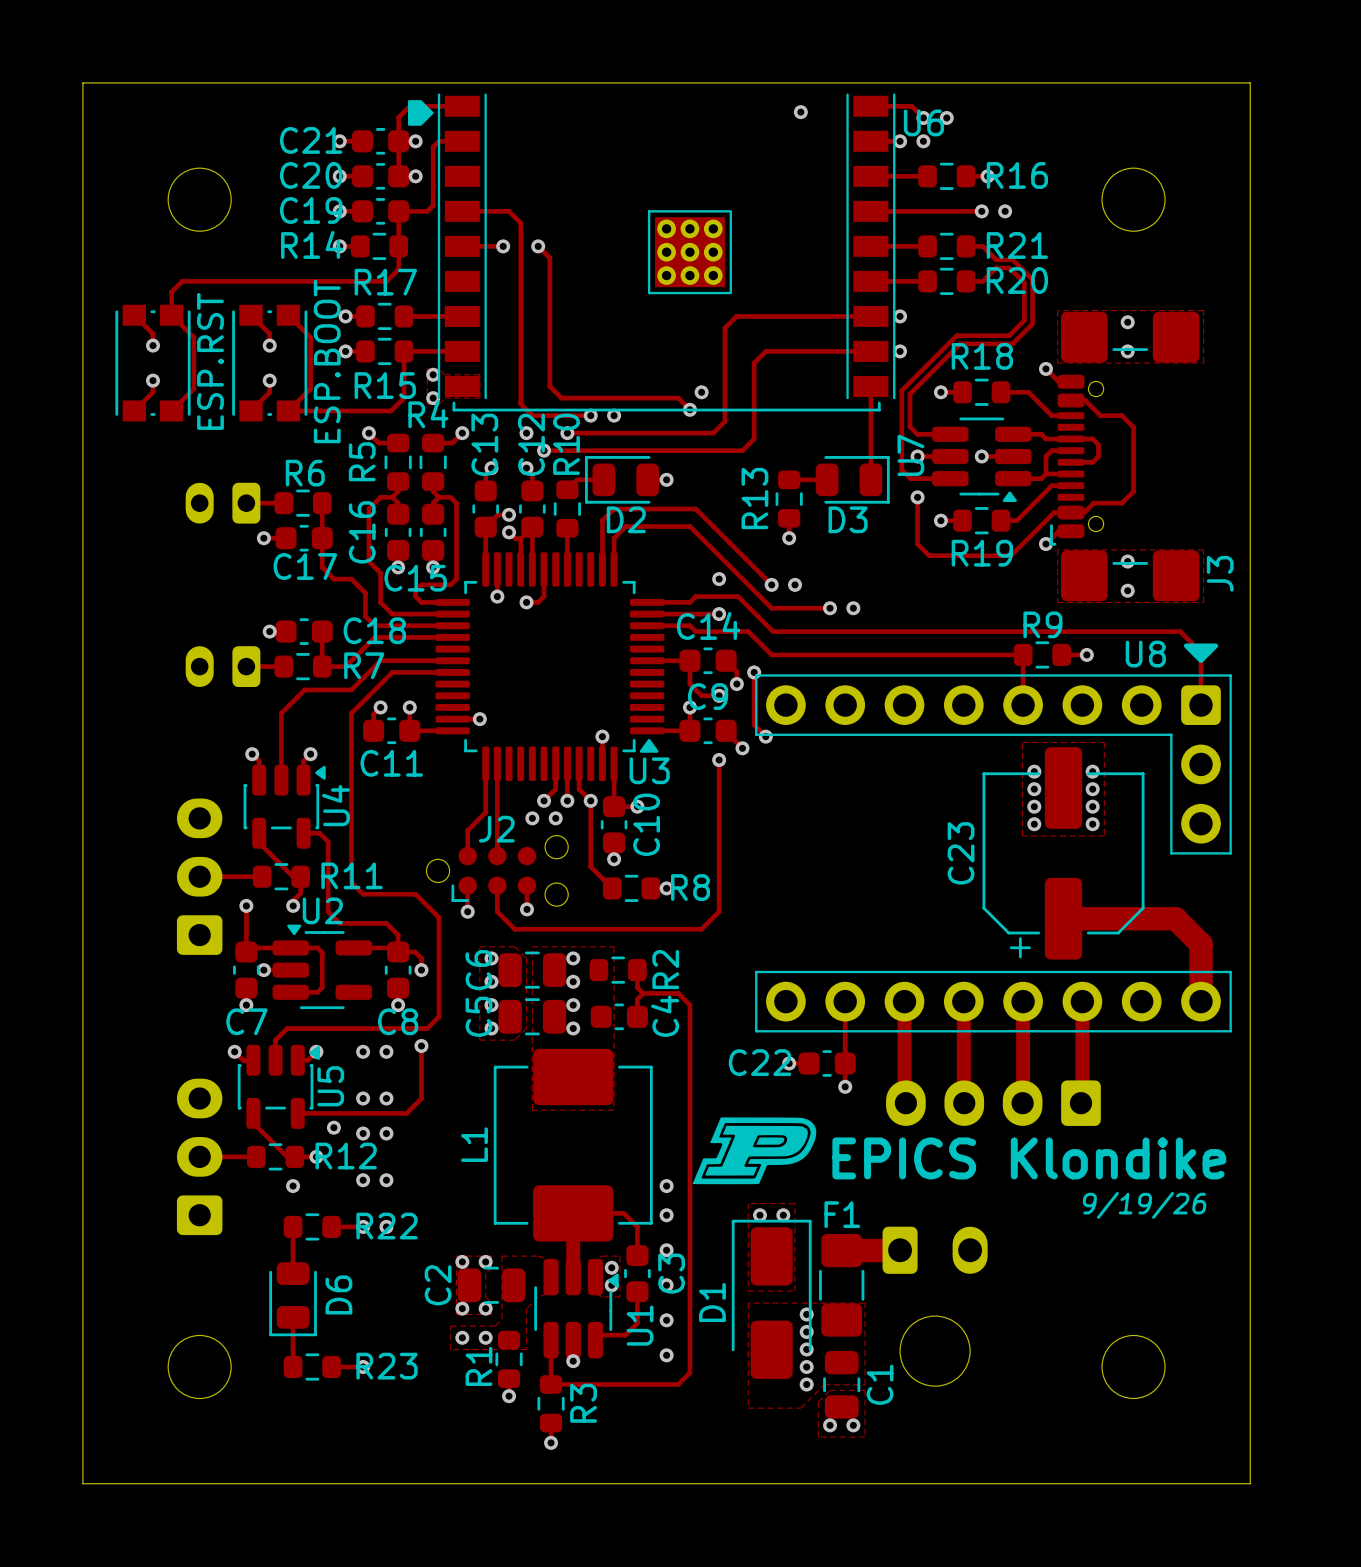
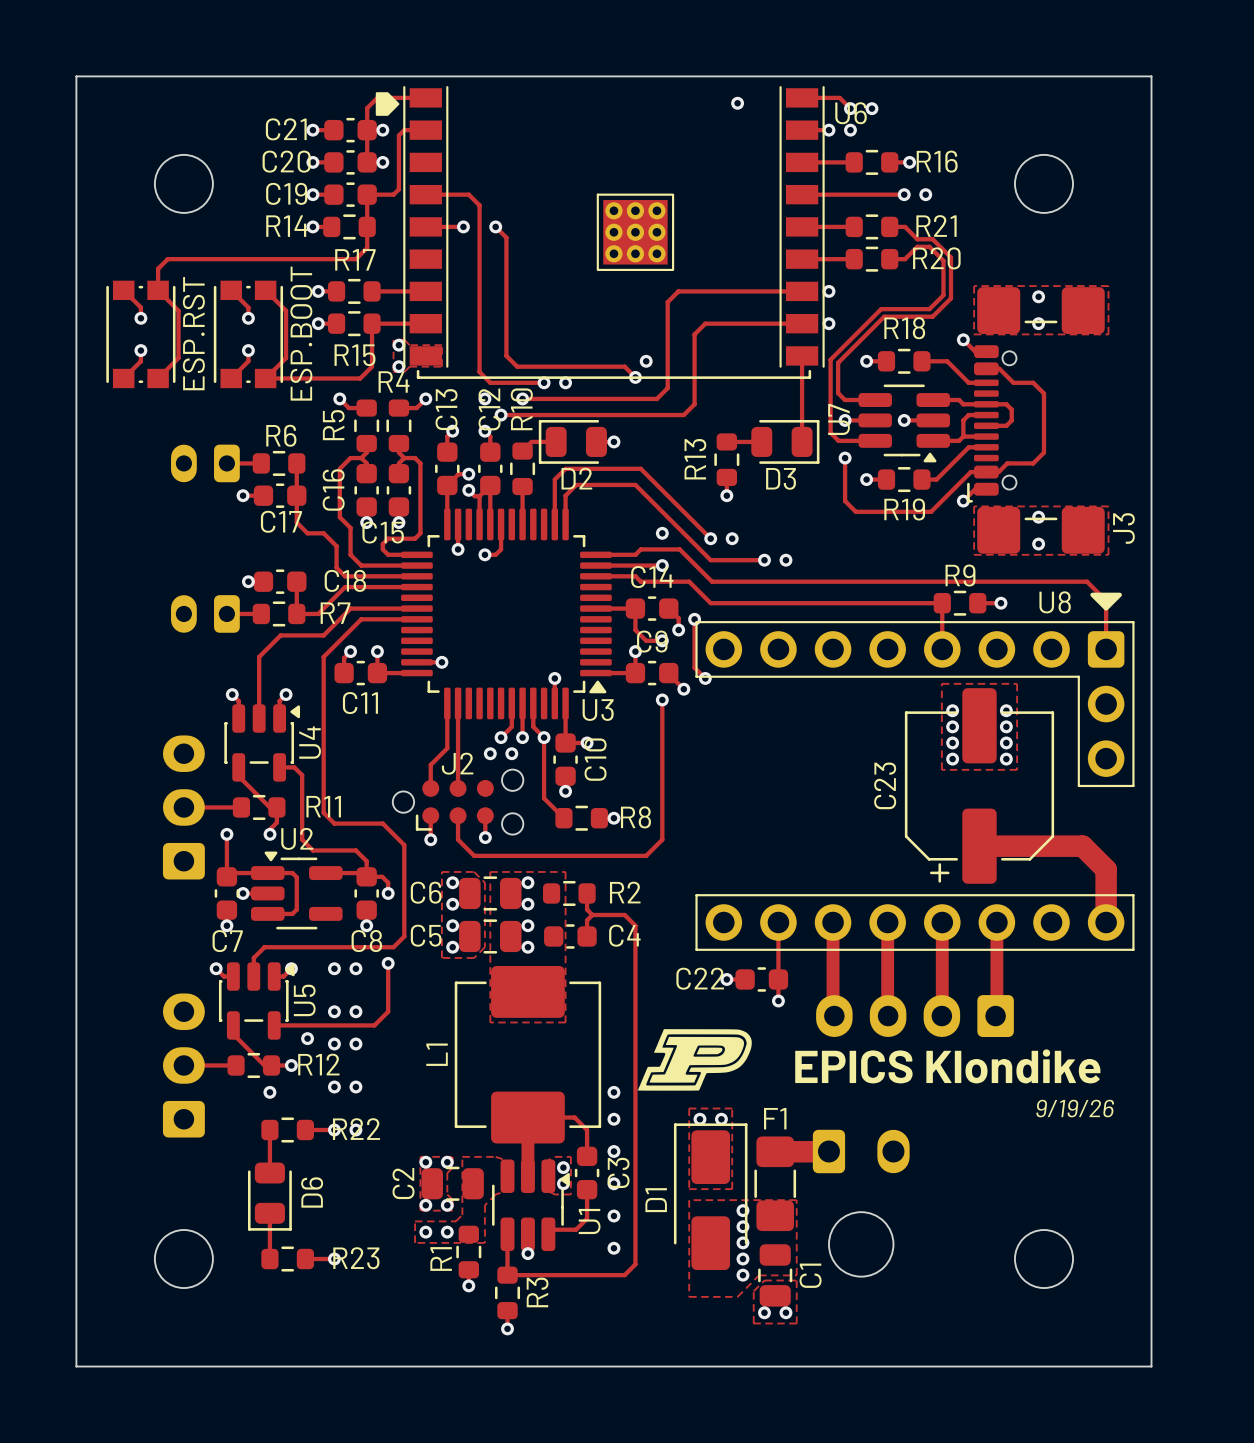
R2 name rotation: 0° (665, 969) -> 90° clockwise (625, 892)
C6 name rotation: 0° (478, 970) -> 90° clockwise (426, 892)
C5 name rotation: 0° (478, 1016) -> 90° clockwise (426, 935)
C4 name rotation: 0° (665, 1016) -> 90° clockwise (624, 935)

